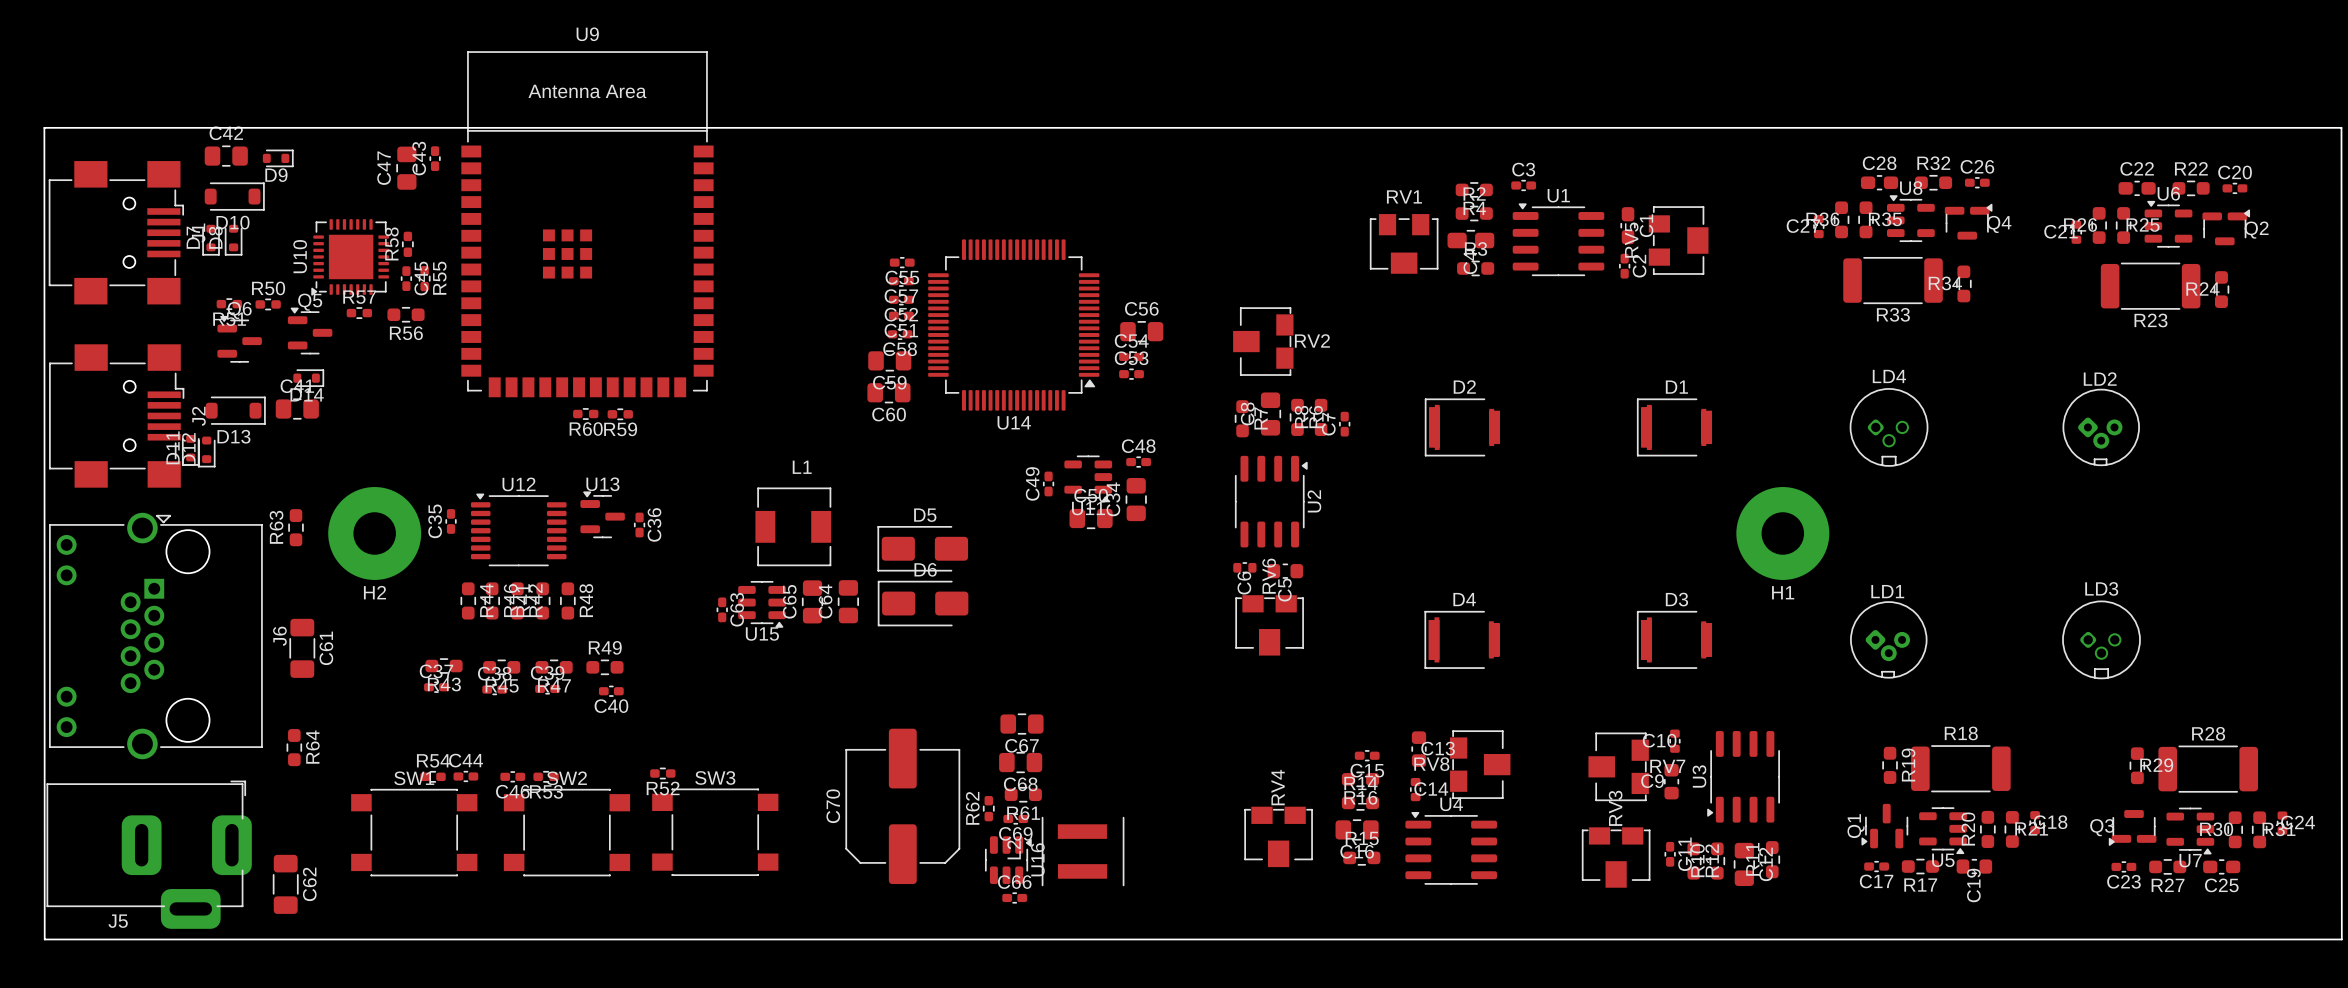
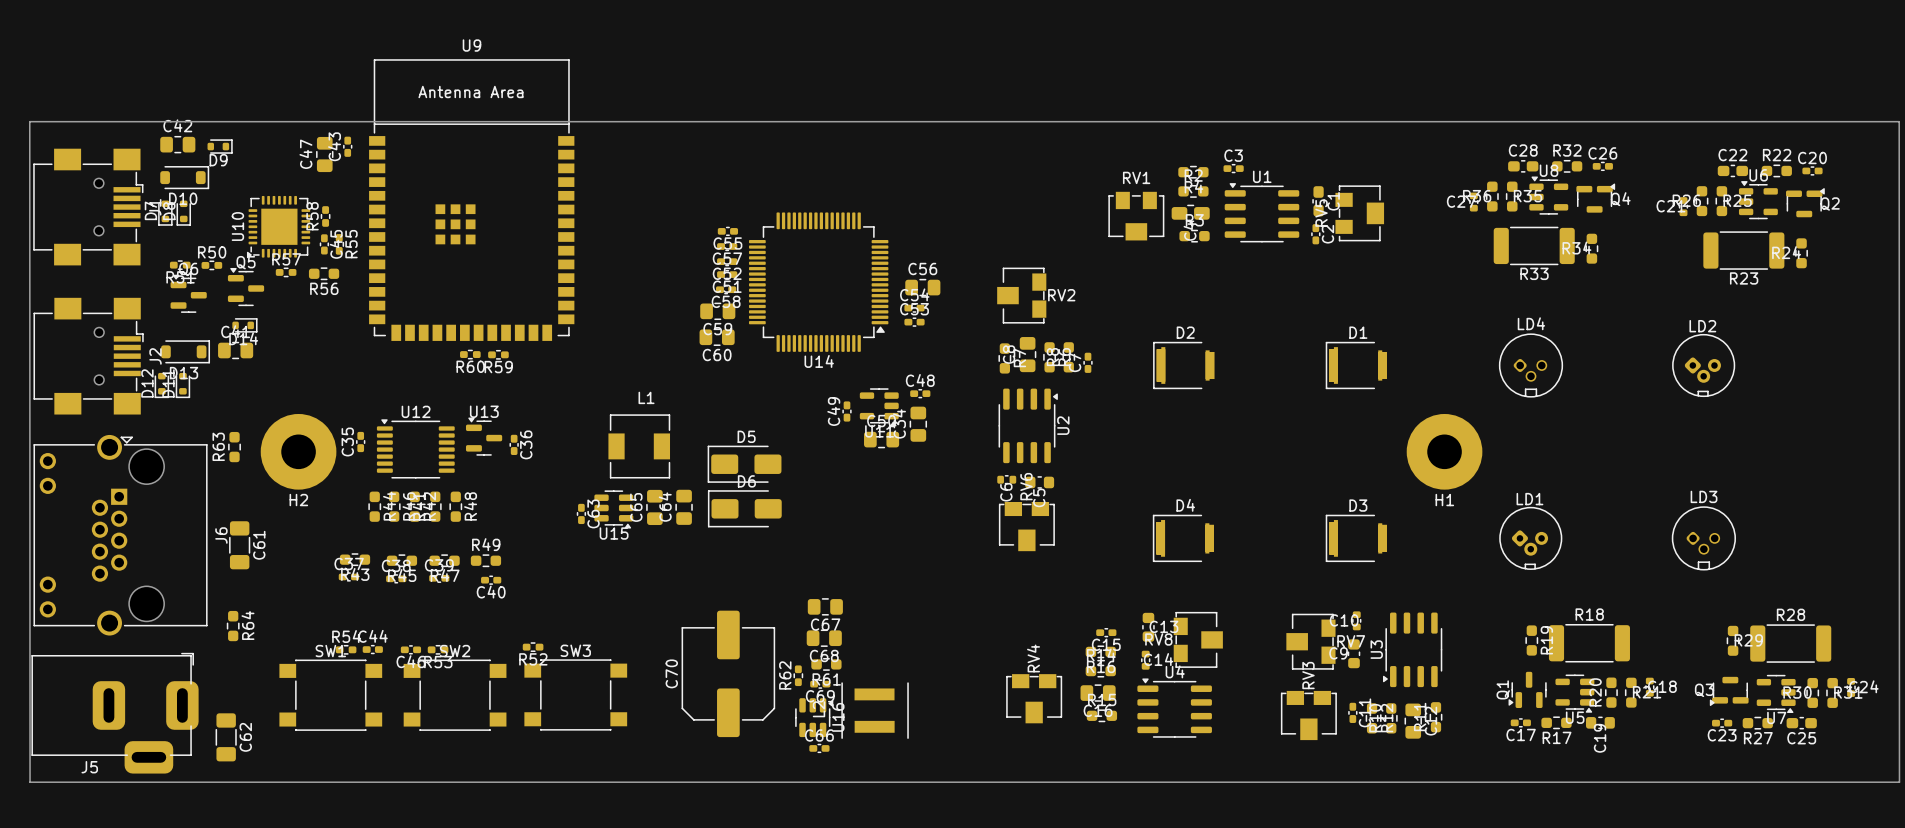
D11 position: (190, 450) -> (182, 385)

